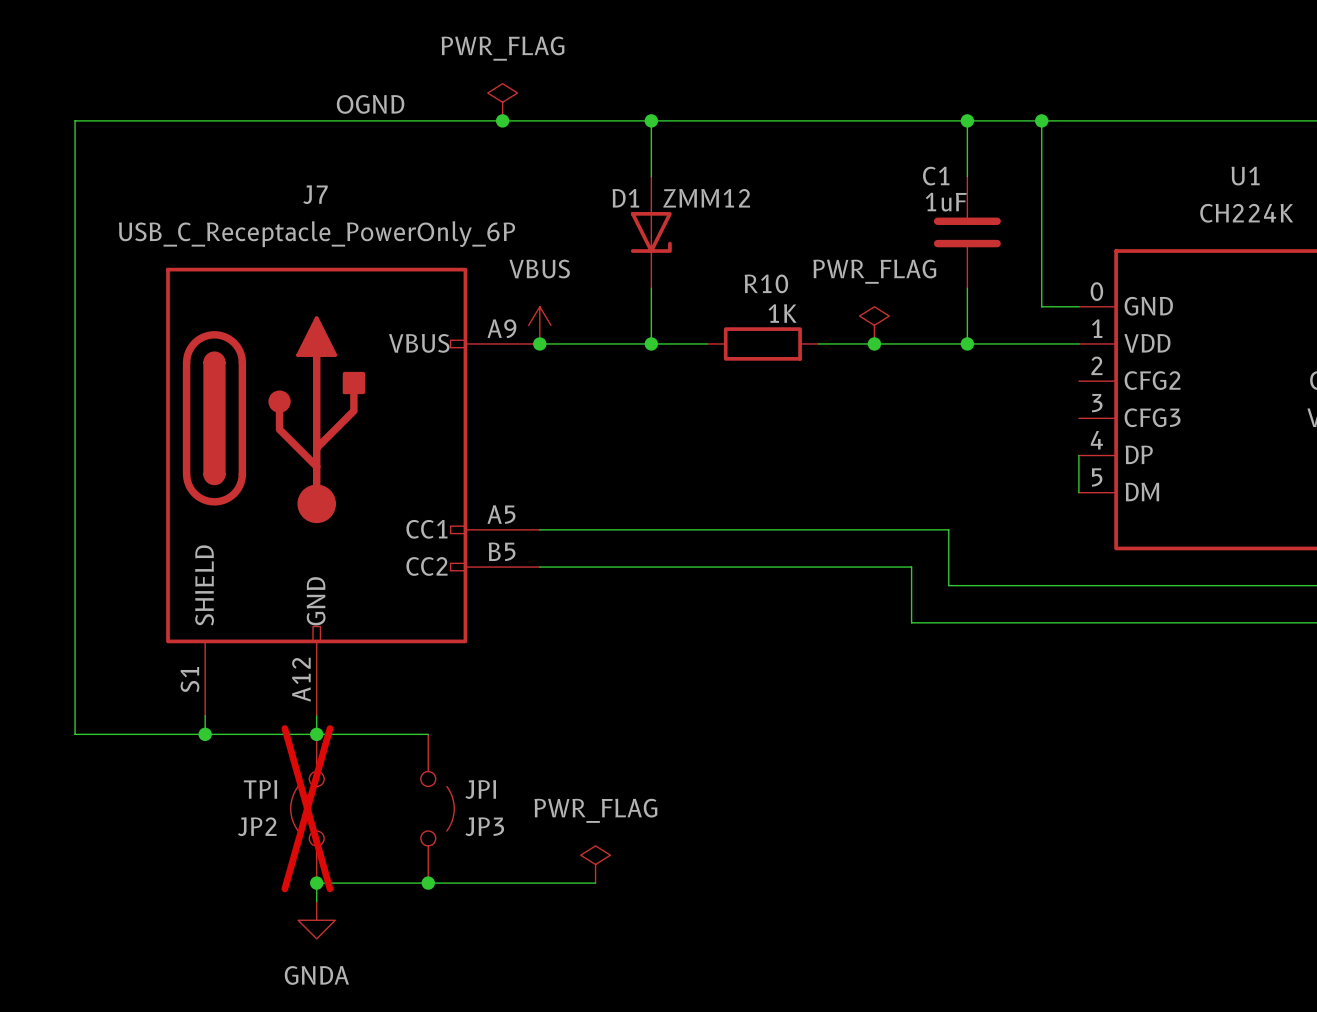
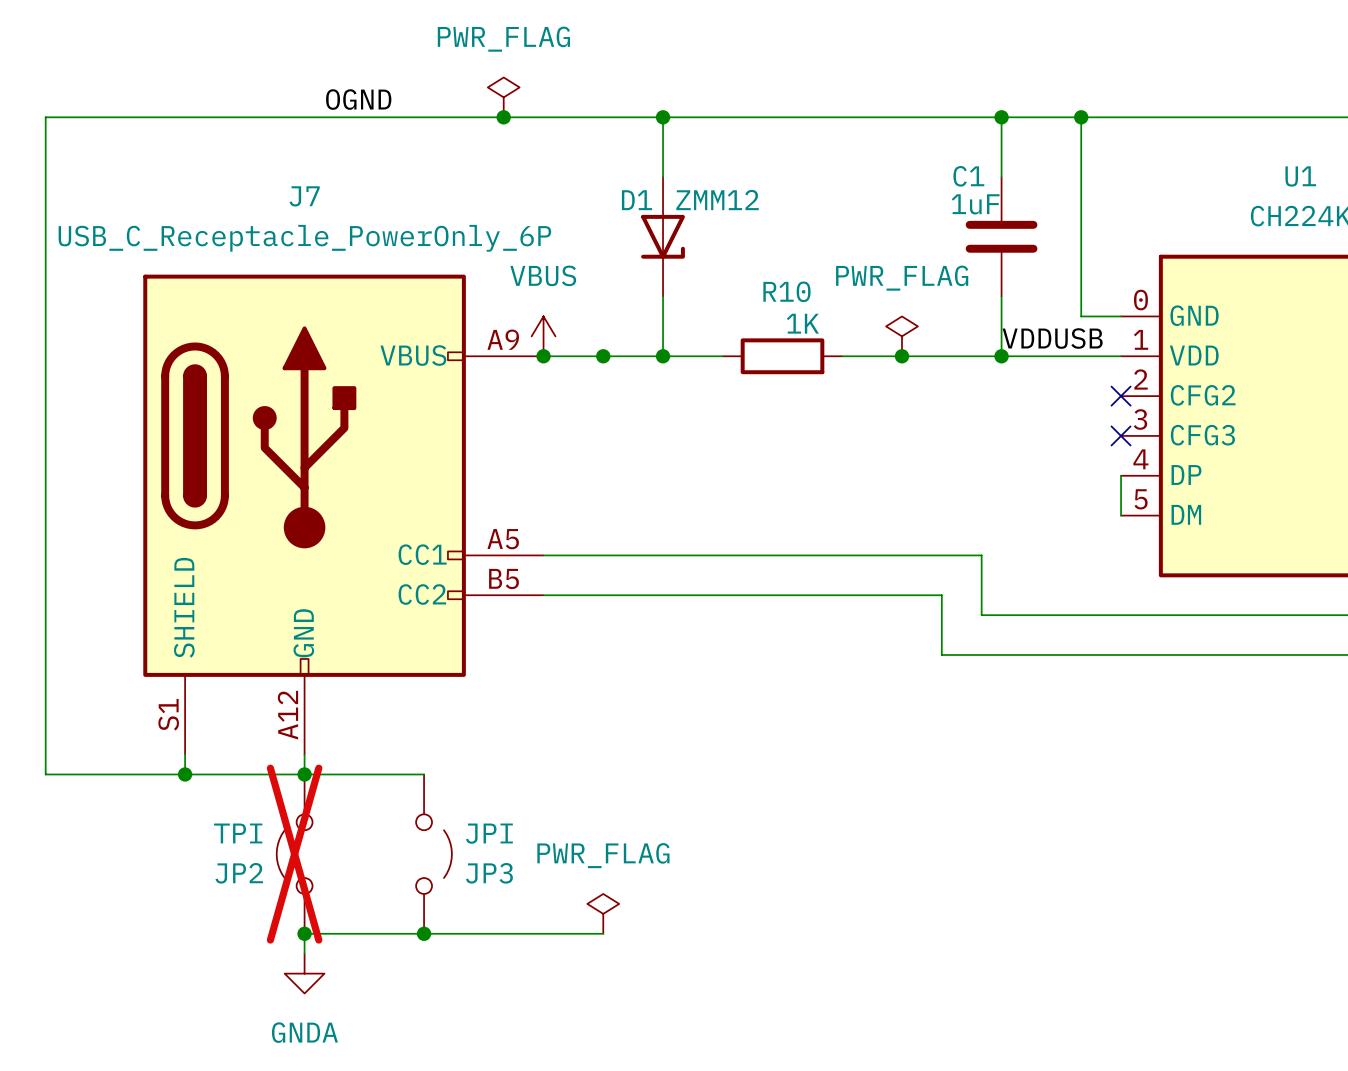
label: none -> VDDUSB (1052, 338)
junction: none -> (603, 356)
no-connect mark: none -> (1121, 396)
no-connect mark: none -> (1121, 435)

